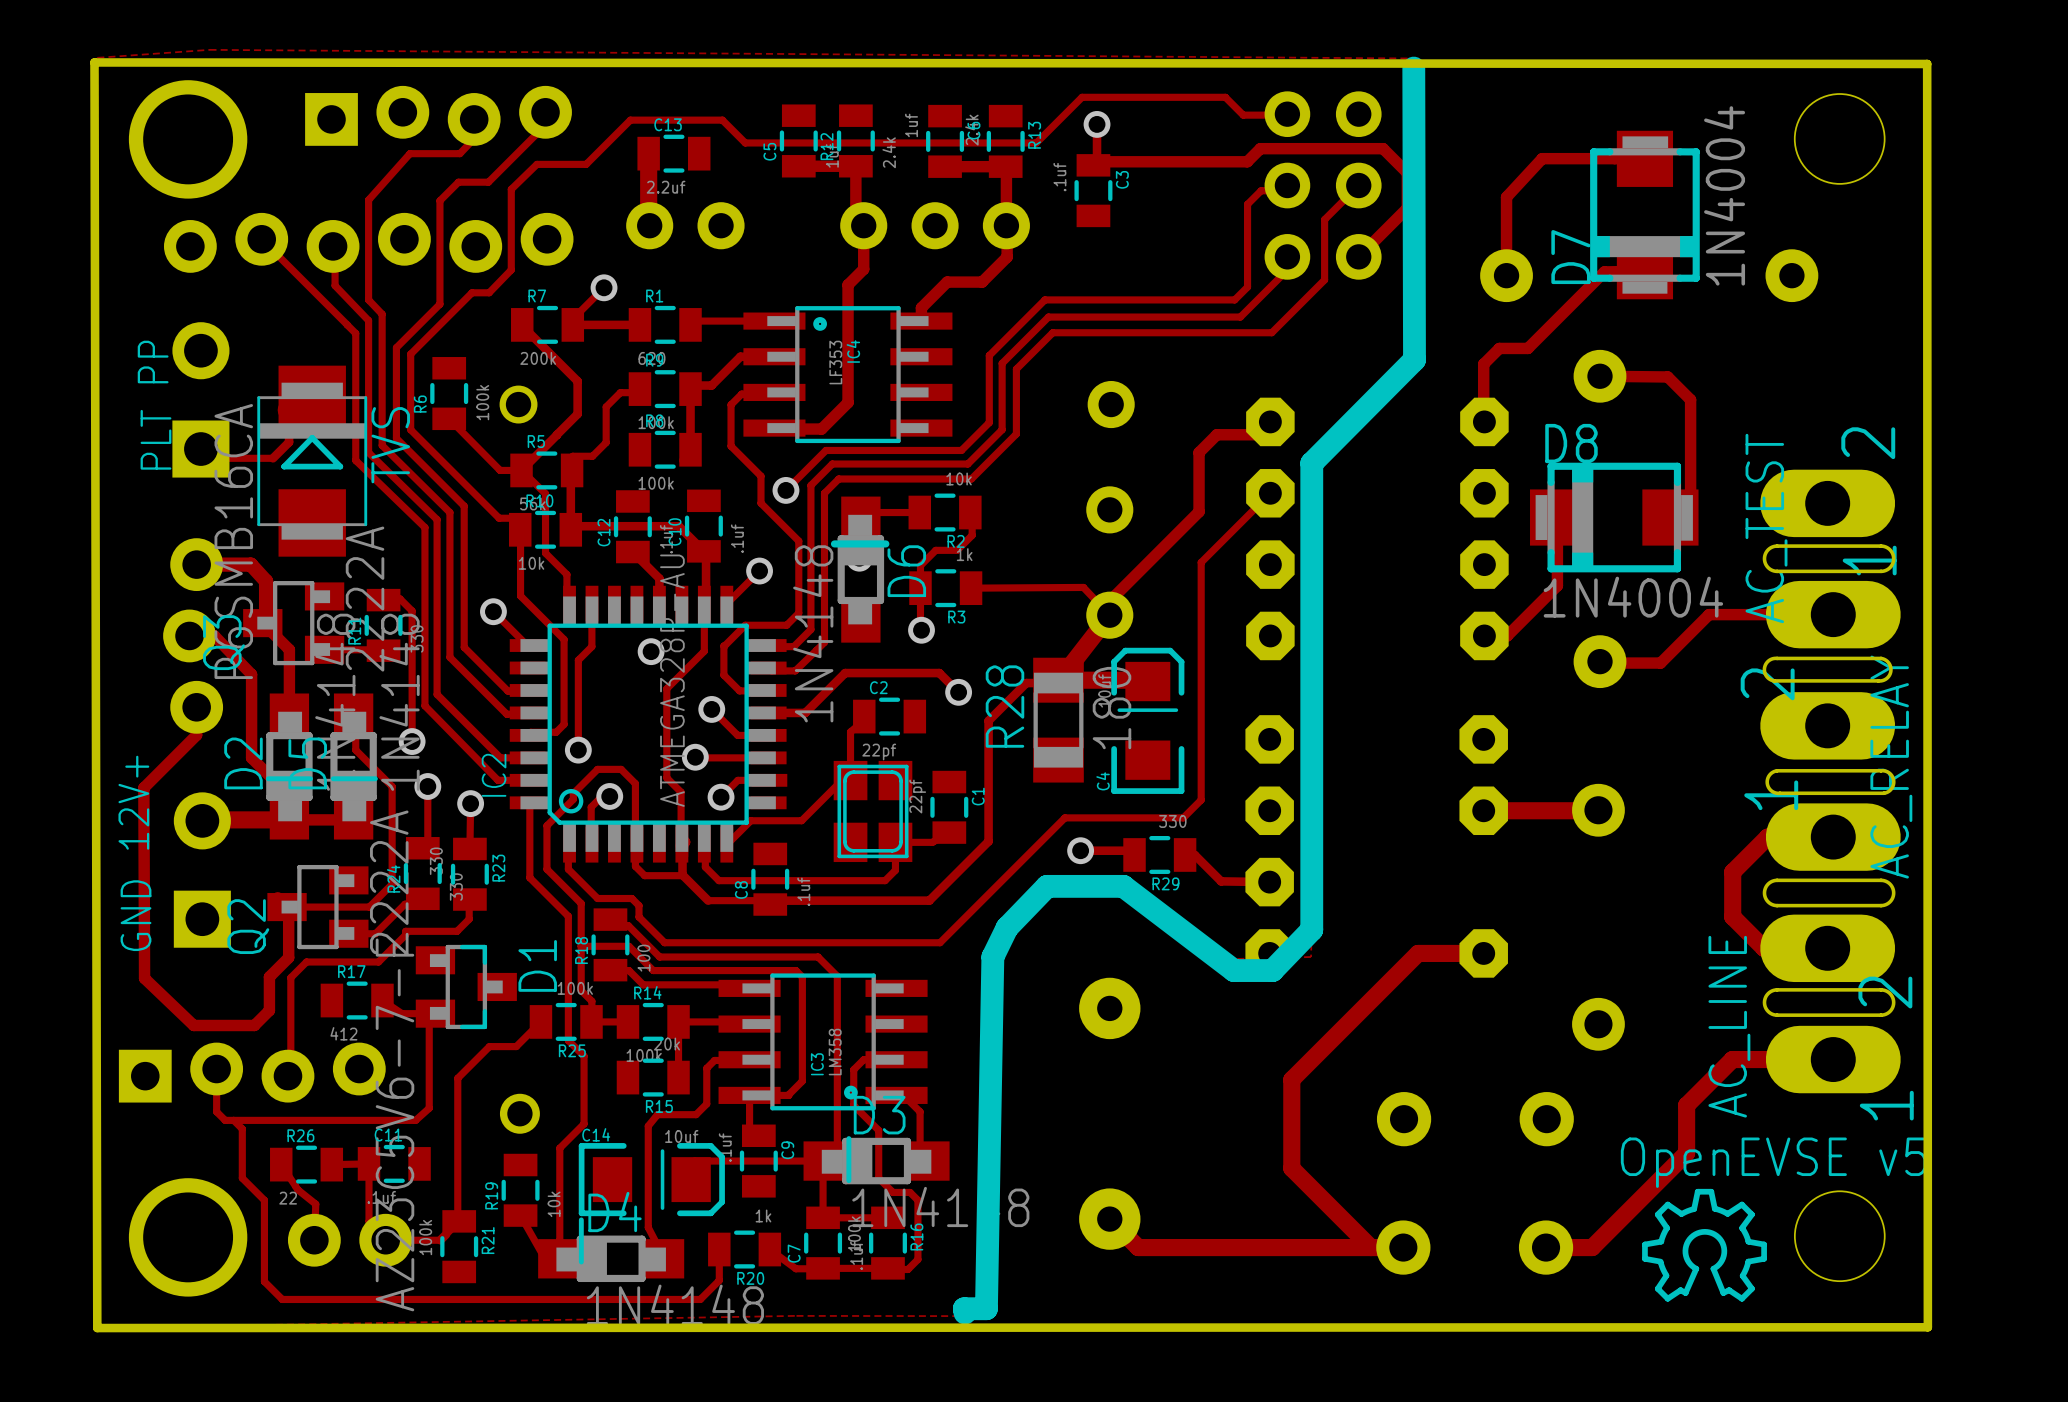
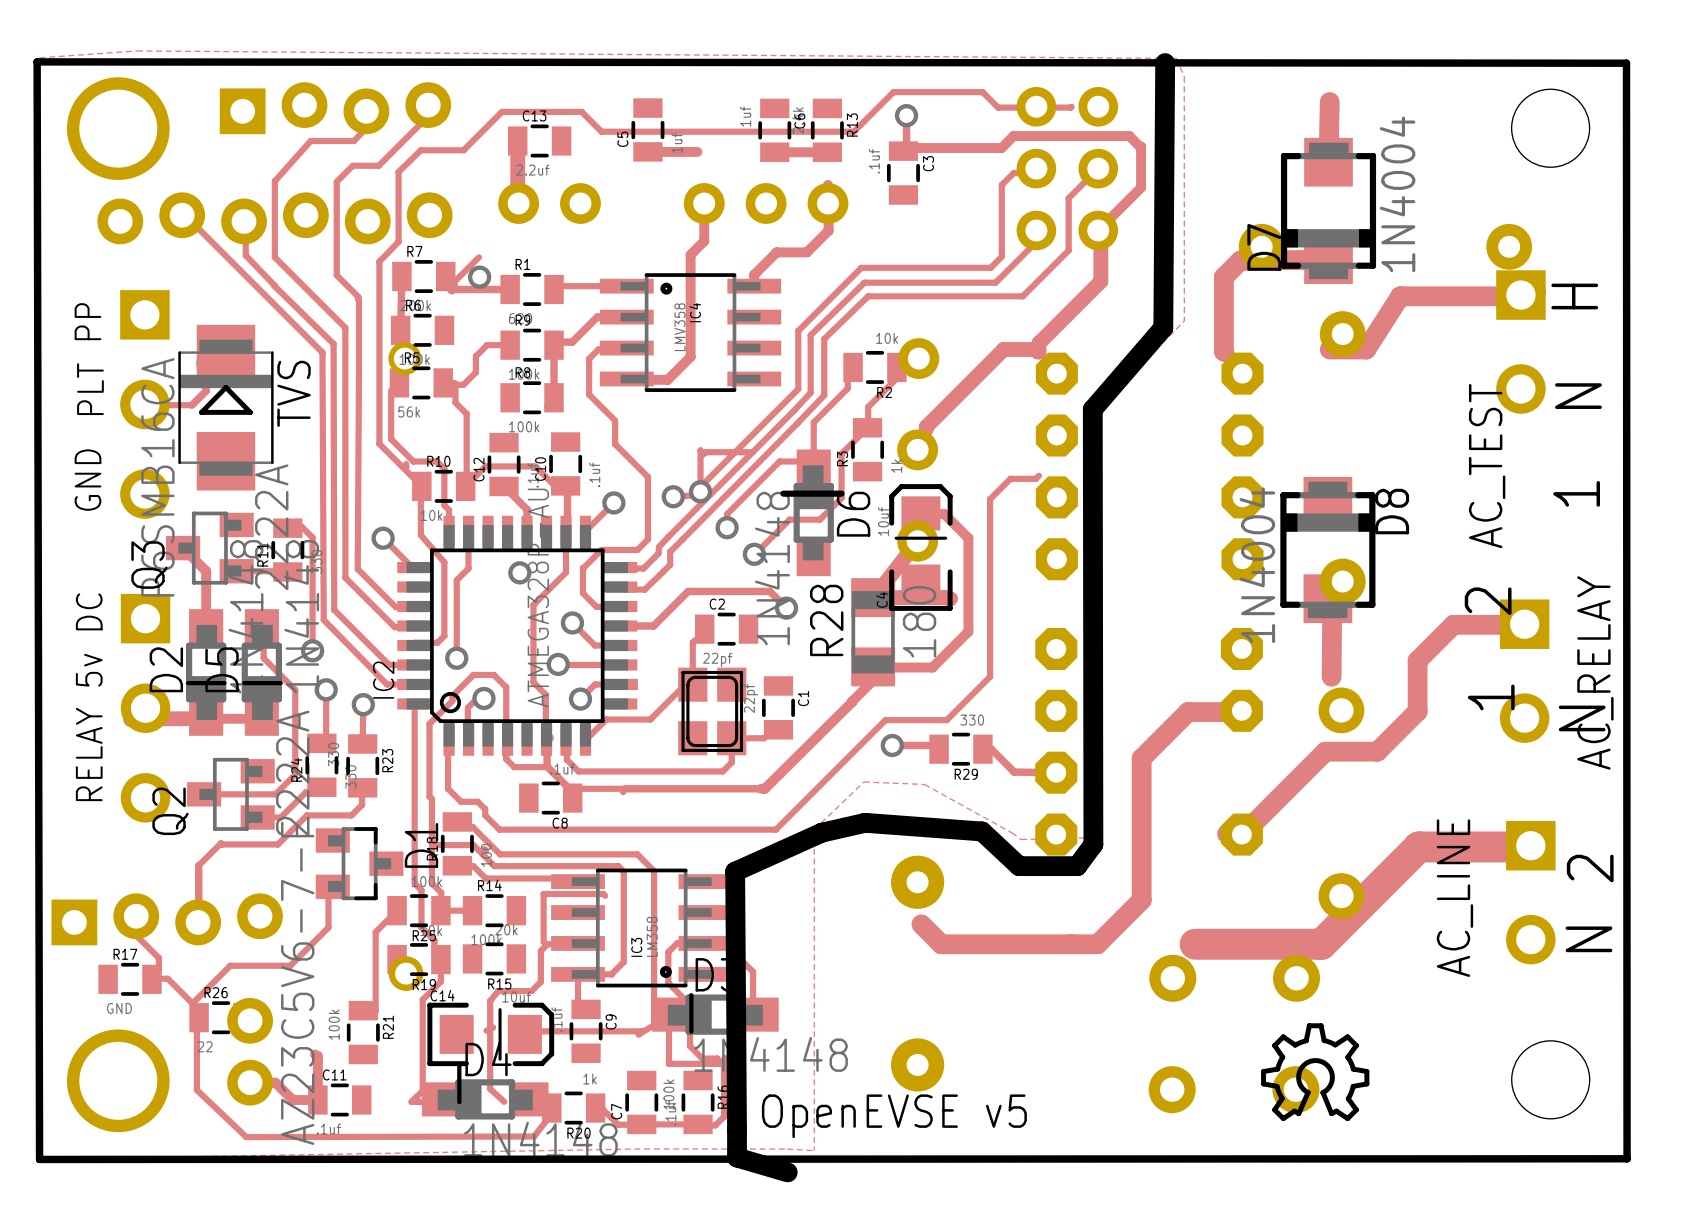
line: none -> (1165, 63) (1163, 327) (1092, 409) (1093, 844) (1077, 866) (1019, 866) (982, 831) (865, 822) (821, 832) (735, 871) (737, 1157) (787, 1172)
line: (1413, 68) (1414, 359) (1311, 463) (1311, 929) (1272, 970) (1234, 970) (1123, 886) (1047, 886) (1007, 927) (992, 957) (986, 1308) (964, 1308) (965, 1313) -> none
track: (1184, 97) (1225, 97) (1243, 115) -> (982, 92) (998, 107) (1033, 107)
track: none -> (1329, 102) (1328, 162)
R12: 2.4k (855, 140) -> none
track: (1644, 158) (1542, 158) (1506, 197) (1506, 275) -> none
track: (1206, 161) (1247, 161) (1260, 148) (1383, 148) (1407, 172) (1407, 208) (1358, 256) -> (1001, 148) (1013, 136) (1129, 136) (1141, 146) (1141, 187) (1098, 230) (1100, 233) (1100, 281) (1038, 343) (1038, 351)
track: (1002, 164) (1006, 167) (1004, 165) (1005, 166) (1006, 167) (1006, 204) -> none
track: (855, 166) (855, 217) -> none
track: (1287, 185) (1282, 190) (1261, 190) (1247, 204) (1247, 287) (1234, 299) (1194, 299) -> (1036, 168) (1031, 173) (1013, 173) (1001, 184) (1001, 256) (990, 267)
part position: (1323, 185) -> (1067, 168)
track: (1358, 185) (1324, 219) (1324, 279) (1271, 332) (1231, 332) -> (1098, 168) (1068, 198) (1068, 250) (1022, 296)
D7 position: (1644, 215) -> (1328, 210)
track: (272, 249) (355, 333) (355, 460) (424, 527) (424, 705) -> (191, 224) (194, 224) (322, 352) (323, 619)
track: (1287, 256) (1283, 261) (1283, 274) (1240, 317) (1199, 317) -> (1036, 230) (1032, 234) (1032, 245) (995, 282)
track: (1644, 271) (1604, 271) (1527, 348) (1499, 348) (1483, 364) (1484, 421) -> none
track: (368, 287) (368, 299) (382, 314) (382, 445) (449, 512) -> (274, 257) (345, 327) (345, 452)
via position: (604, 287) -> (479, 277)
track: none -> (1328, 259) (1240, 260) (1223, 277) (1224, 351)
track: (489, 292) (472, 292) (410, 354) (410, 429) (499, 518) (512, 518) (520, 529) -> (379, 261) (379, 443) (421, 486) (420, 535) (444, 562)
track: (439, 304) (396, 347) (396, 438) (464, 506) (464, 647) -> (336, 271) (336, 275) (358, 296) (358, 300) (357, 569)
track: (1048, 317) (1002, 363) (1002, 381) -> (868, 296) (824, 338)
track: none -> (864, 282) (810, 335) (810, 392) (668, 536) (659, 546) (658, 553)
track: (368, 320) (368, 452) (437, 519) (437, 694) -> (274, 285) (333, 343) (334, 609)
track: (522, 324) (577, 381) (577, 414) (556, 434) -> none
R7 position: (547, 324) -> (423, 276)
track: none -> (1520, 295) (1524, 291) (1535, 291) (1531, 296) (1400, 296) (1366, 349) (1329, 349)
track: (1052, 332) (1016, 369) (1016, 434) (971, 479) (838, 479) (824, 493) (824, 627) -> none
text: none -> H (1574, 296)
track: (989, 355) (989, 422) (972, 439) -> (813, 316) (798, 330) (798, 389)
IC4 value: LF353 (835, 362) -> LMV358 (680, 327)
track: (1600, 376) (1667, 376) (1690, 399) (1690, 516) (1670, 517) -> none
part: none -> (1520, 342)
track: (639, 389) (641, 392) (620, 392) (606, 406) (606, 442) (592, 456) (572, 456) (572, 470) (570, 462) (570, 529) (574, 526) (678, 526) (703, 551) -> (510, 345) (487, 345) (475, 356) (475, 372) (463, 384) (445, 384) (443, 382) (455, 384) (455, 402) (466, 413) (466, 485)
R6 rotation: 0° (449, 393) -> 90° clockwise (422, 330)
R6 position: (449, 393) -> (422, 330)
track: none -> (1038, 351) (1036, 349) (1003, 349) (926, 426) (926, 429)
part: (200, 399) -> none
track: none -> (853, 367) (847, 372) (847, 388) (813, 422) (813, 466) (808, 461) (779, 461) (727, 514) (727, 527)
track: (449, 418) (500, 470) (521, 470) -> none
track: (1270, 421) (1257, 434) (1216, 434) (1199, 452) (1199, 511) (1107, 603) (1109, 615) (1083, 587) (971, 588) (970, 583) -> none
track: (1002, 429) (967, 464) (832, 464) (810, 485) (810, 629) -> (824, 380) (824, 395) (670, 551)
track: (556, 435) (521, 470) -> none
text: 2 (1868, 443) -> N (1578, 396)
track: (961, 450) (825, 450) (785, 490) -> (788, 398) (691, 495) (673, 496)
part: none -> (144, 404)
part footprint: [1760, 469, 1901, 1094] -> [1499, 599, 1550, 743]
track: (521, 470) (545, 493) (545, 553) (566, 574) (566, 606) (570, 606) (569, 603) -> (401, 276) (399, 382) (391, 391) (391, 439) (413, 461) (436, 461) (444, 468) (444, 505) (449, 510) (449, 531)
R5 position: (546, 470) -> (421, 382)
via: (785, 490) -> none
track: (1270, 493) (1201, 562) (1201, 800) (1183, 817) (1064, 817) (940, 942) (664, 942) (638, 917) (638, 905) (631, 898) (597, 898) (568, 869) -> (1038, 475) (1035, 478) (1010, 478) (990, 499) (990, 676) (946, 720) (885, 720) (776, 829) (499, 829) (485, 815) (485, 809) (477, 801) (461, 801) (448, 788) (448, 761)
R2 position: (945, 512) -> (874, 367)
track: (970, 512) (972, 514) (972, 535) (957, 550) (935, 550) (920, 565) (920, 629) -> (896, 367) (896, 378) (868, 407) (868, 427) (841, 453) (841, 498) (819, 519) (789, 519) (755, 553) (753, 553)
track: (1558, 517) (1557, 585) (1507, 635) (1484, 635) -> none
D8 rotation: 0° (1614, 517) -> 90° clockwise (1327, 549)
D8 position: (1614, 517) -> (1327, 549)
track: (520, 529) (520, 526) (520, 596) (564, 639) -> none
R10 position: (545, 529) -> (443, 486)
line: (834, 543) (885, 543) -> none
track: none -> (565, 485) (554, 485) (535, 466) (485, 466) (465, 486)
line: none -> (783, 493) (841, 493)
via: none -> (673, 496)
track: (196, 564) (250, 564) (266, 581) (266, 626) -> none
D6 position: (860, 569) -> (813, 512)
R3 rotation: 0° (945, 588) -> 90° clockwise (867, 449)
R3 position: (945, 588) -> (867, 449)
via: none -> (727, 527)
track: (1833, 614) (1709, 614) (1660, 663) (1600, 661) -> none
track: (189, 635) (214, 635) (251, 674) (251, 757) (287, 794) (287, 817) (285, 819) -> none
part: (193, 635) -> none
track: (1058, 680) (1055, 683) (1026, 683) (988, 720) (988, 841) (929, 900) -> (916, 517) (920, 513) (944, 514) (968, 538) (968, 631) (932, 667) (886, 667) (764, 788) (761, 788)
track: none -> (1327, 598) (1332, 604) (1331, 676)
track: (196, 707) (196, 735) (143, 787) (144, 978) (193, 1025) (254, 1025) (269, 1010) (269, 976) (288, 957) (288, 908) (277, 897) -> none
track: none -> (1524, 624) (1453, 624) (1417, 660) (1417, 711) (1377, 751) (1325, 751) (1243, 833) (1227, 833)
C4 position: (1147, 720) -> (920, 547)
text: none -> RELAY 5v DC (89, 697)
text: 12V+ (133, 802) -> none
part: none -> (145, 708)
track: none -> (1227, 710) (1225, 712) (1188, 712) (1141, 758) (1141, 900) (1097, 944) (941, 944) (921, 924)
track: (1598, 810) (1483, 810) -> none
text: none -> N (1582, 718)
track: (1833, 837) (1767, 837) (1732, 872) (1732, 916) (1764, 948) (1827, 948) -> none
track: (546, 869) (581, 903) (581, 990) (591, 1001) (591, 1021) (627, 1021) -> (429, 761) (431, 841) (436, 845) (473, 845) (494, 866) (618, 866) (623, 871) (623, 962) (612, 974) (578, 974) (578, 1001) (586, 1009)
part: (202, 870) -> none
track: (529, 877) (568, 916) (568, 1040) (584, 1056) (584, 1123) (559, 1148) (559, 1240) (557, 1258) (549, 1266) (520, 1215) -> (414, 768) (414, 883) (421, 890) (420, 926) (434, 940) (434, 953) (440, 959) (440, 981) (422, 999) (422, 1090) (411, 1101) (421, 1101)
C8 rotation: 0° (770, 879) -> 90° clockwise (550, 798)
C8 position: (770, 879) -> (550, 798)
text position: GND (136, 915) -> GND (87, 480)
track: (606, 918) (616, 925) (628, 925) (659, 957) (818, 957) (837, 976) (837, 1153) (819, 1164) (823, 1161) (694, 1161) (691, 1164) (691, 1179) -> none
track: (405, 931) (405, 934) (378, 962) (306, 962) (290, 977) (290, 1073) (287, 1076) -> (307, 815) (277, 844) (221, 843) (198, 865) (198, 922)
track: none -> (454, 820) (462, 827) (472, 827) (500, 854) (637, 854) (654, 871) (654, 1025) (638, 1034)
track: (581, 942) (586, 947) (629, 946) (653, 970) (795, 970) (802, 976) (802, 1081) (788, 1095) (749, 1095) (749, 1126) (754, 1132) -> none
R18 position: (610, 944) -> (457, 843)
track: (1483, 953) (1418, 953) (1291, 1079) (1291, 1168) (1370, 1247) -> none
track: none -> (433, 843) (431, 845) (431, 883) (441, 892) (440, 910) (472, 910)
track: none -> (1530, 845) (1418, 846) (1321, 944) (1195, 944)
track: (610, 970) (629, 970) (643, 984) (746, 984) (749, 988) -> (457, 866) (473, 866) (485, 878) (574, 878) (578, 881)
R17 position: (357, 1000) -> (130, 979)
track: (382, 1000) (402, 1013) (435, 1013) (429, 1023) (429, 1108) (415, 1120) (225, 1120) (216, 1111) (216, 1069) -> none
track: none -> (328, 886) (328, 927) (290, 965) (230, 965) (192, 1003)
part: none -> (1530, 892)
track: (540, 1021) (516, 1046) (489, 1046) (457, 1078) (459, 1221) (440, 1240) (385, 1240) (369, 1221) (369, 1163) (331, 1164) -> none
R25 position: (566, 1021) -> (419, 910)
R14 position: (653, 1021) -> (494, 910)
R17 value: 412 (343, 1033) -> GND (119, 1008)
track: none -> (397, 910) (375, 932) (375, 1010) (363, 1010)
IC3 position: (823, 1041) -> (641, 928)
track: none -> (136, 916) (135, 898) (135, 934) (158, 958) (158, 970) (151, 979) (167, 978) (196, 1007) (196, 1090) (246, 1137) (534, 1136) (551, 1114) (551, 1108)
track: (749, 1059) (714, 1060) (706, 1068) (706, 1103) (696, 1114) (657, 1114) (648, 1126) (648, 1227) (664, 1258) -> none
track: (896, 1059) (863, 1059) (853, 1069) (853, 1105) (878, 1130) (878, 1178) (892, 1192) (910, 1192) (917, 1200) (917, 1259) (907, 1269) (887, 1268) -> (705, 943) (677, 943) (668, 952) (668, 983) (690, 1004) (690, 1046) (702, 1058) (717, 1058) (724, 1065) (724, 1116) (715, 1125) (698, 1124)
track: (1833, 1059) (1732, 1059) (1686, 1105) (1686, 1153) (1592, 1247) (1546, 1247) -> none
part position: (252, 1072) -> (167, 919)
text: none -> N (1588, 939)
R15 position: (653, 1077) -> (494, 958)
track: none -> (578, 943) (547, 944) (540, 950) (540, 981) (531, 991) (498, 991) (490, 1001) (490, 1088) (504, 1101)
text: 1 (1886, 1105) -> none
track: (233, 1120) (242, 1128) (242, 1178) (264, 1200) (264, 1281) (282, 1299) (700, 1299) (719, 1280) (719, 1249) -> none
C9 position: (758, 1161) -> (586, 1031)
text position: OpenEVSE v5 (1773, 1162) -> OpenEVSE v5 (894, 1116)
C11 position: (394, 1163) -> (339, 1100)
track: (281, 1164) (297, 1189) (315, 1204) (314, 1240) -> none
C14 position: (651, 1179) -> (490, 1034)
track: none -> (524, 1034) (530, 1031) (641, 1031) (638, 1034)
R19 rotation: 0° (520, 1190) -> 90° clockwise (419, 959)
R19 position: (520, 1190) -> (419, 959)
track: none -> (319, 1054) (315, 1054) (317, 1057) (317, 1100) (292, 1100) (275, 1082) (250, 1082)
track: (1109, 1219) (1138, 1247) (1403, 1247) -> none
part rotation: 0° (350, 1240) -> 90° clockwise (250, 1051)
C7 position: (823, 1243) -> (641, 1102)
R16 position: (887, 1243) -> (698, 1102)
drawing position: (1704, 1245) -> (1315, 1072)
R21 position: (459, 1246) -> (363, 1032)
R20 position: (744, 1249) -> (573, 1108)
track: (769, 1249) (795, 1268) (822, 1268) -> none
track: none -> (601, 1108) (618, 1124) (641, 1124)
track: (887, 1268) (821, 1269) -> (698, 1124) (640, 1125)

